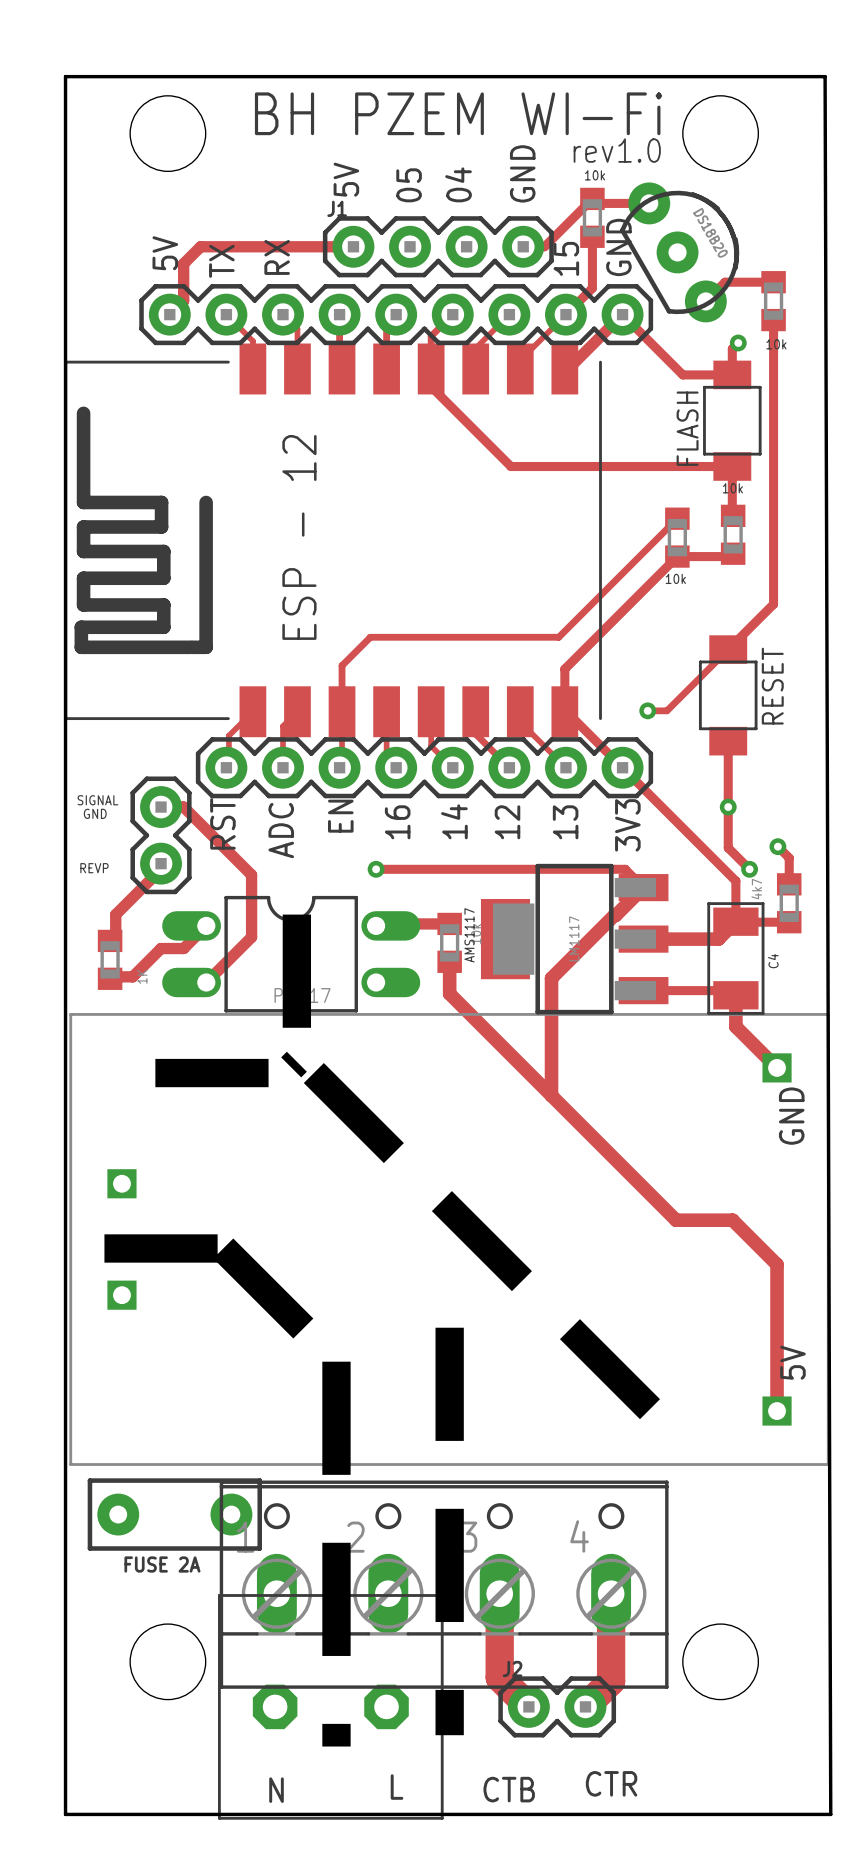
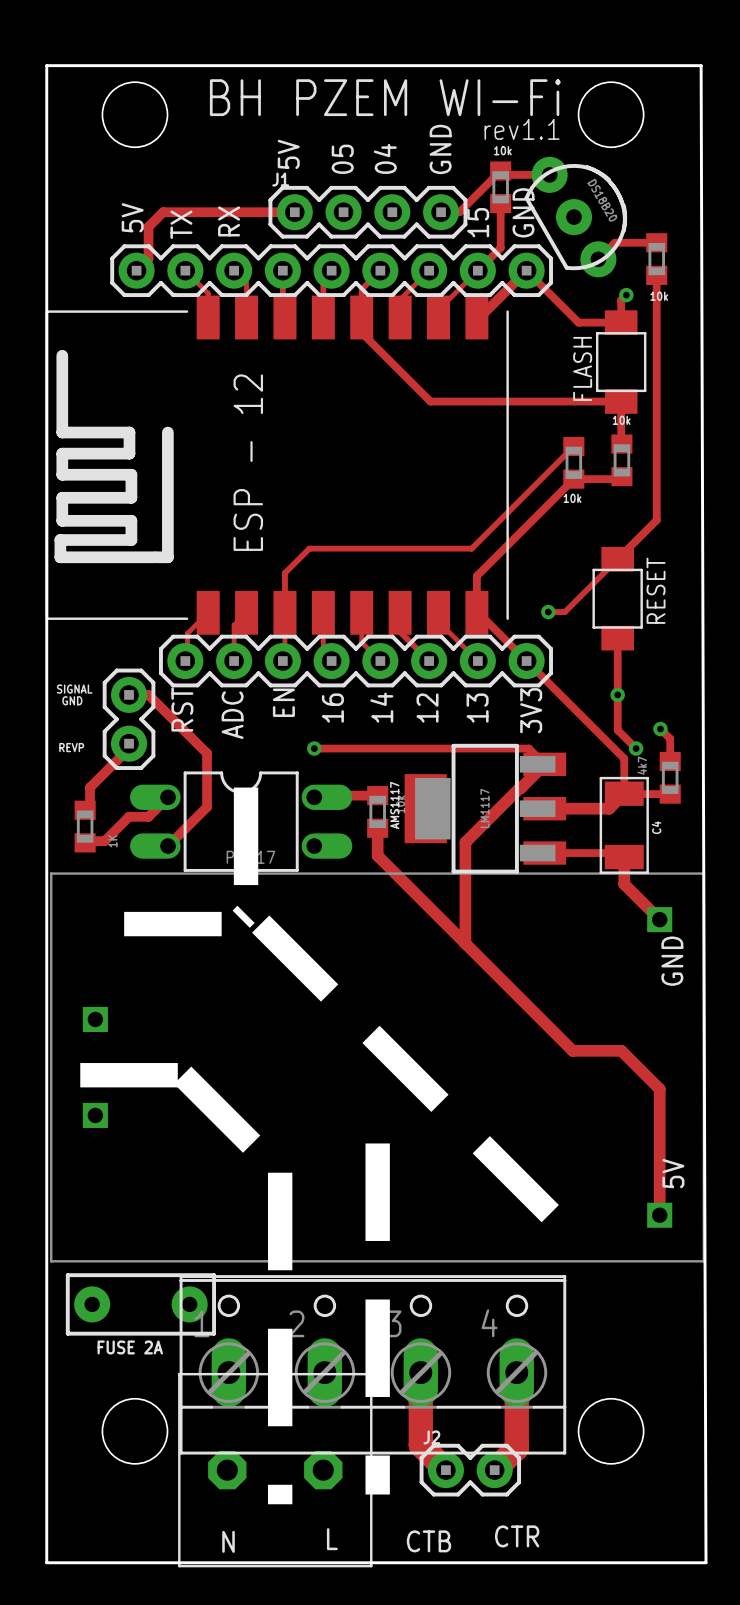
text: rev1.0 (617, 150) -> rev1.1 (522, 129)

